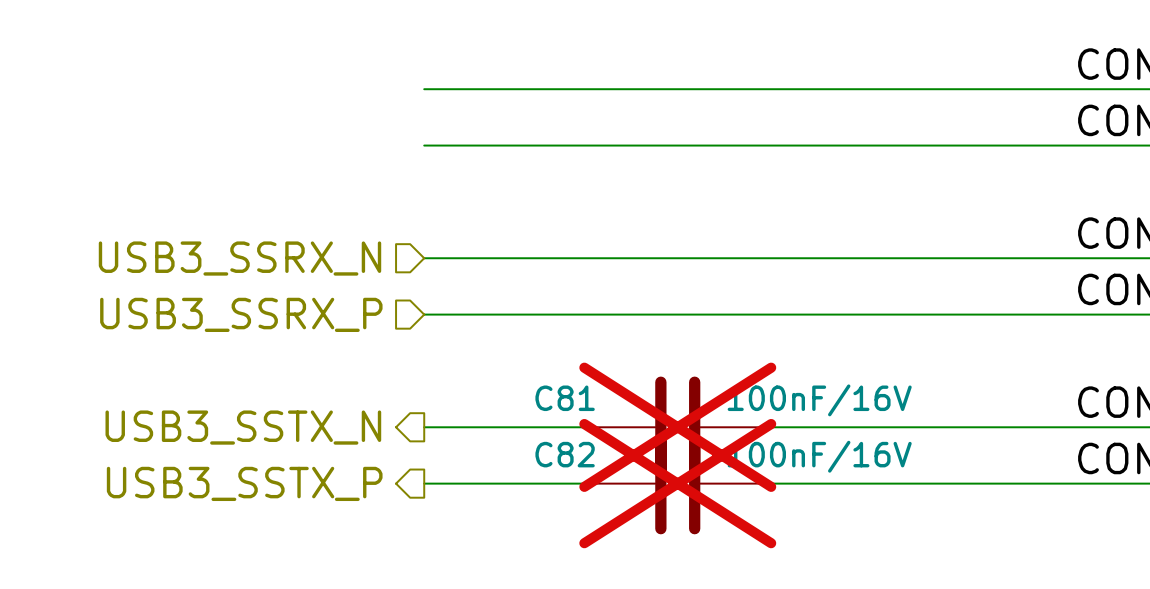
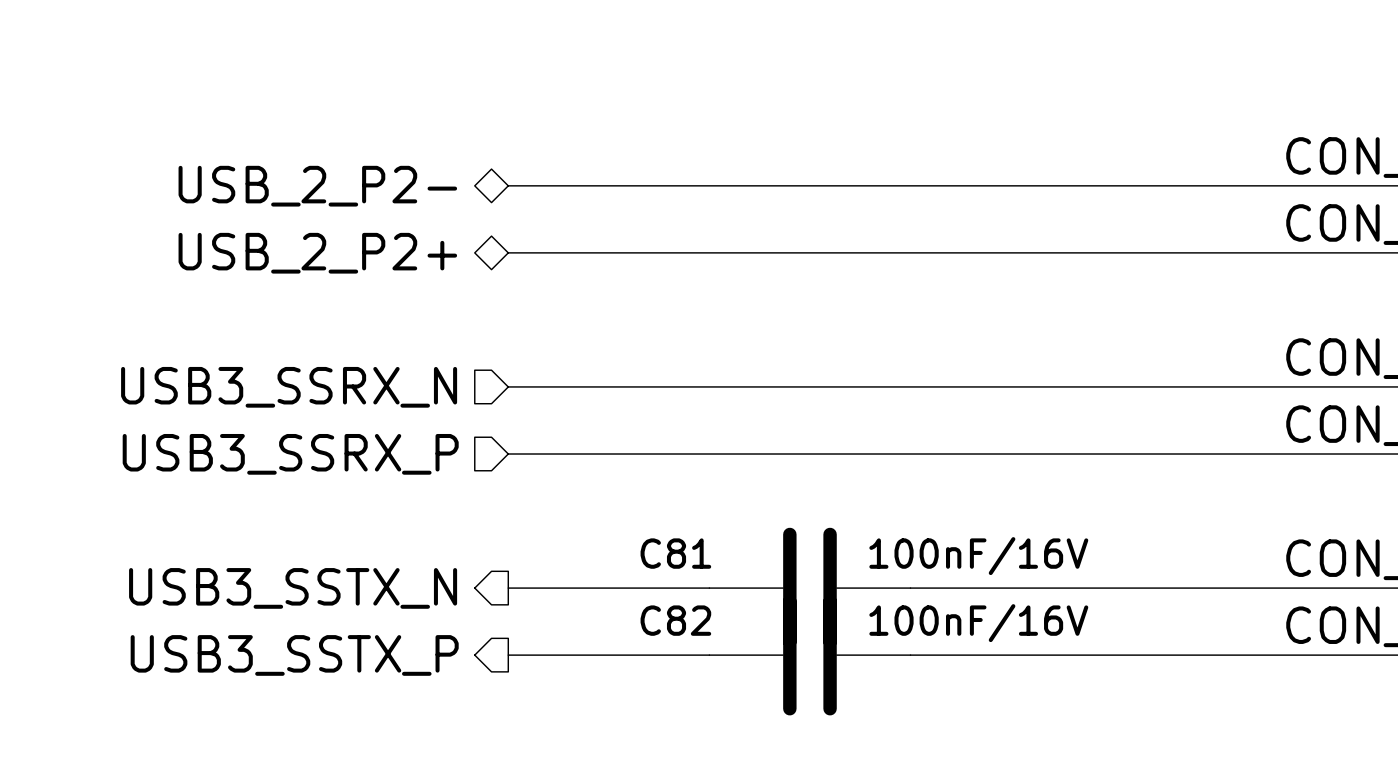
hierarchical label: none -> USB_2_P2- (317, 186)
hierarchical label: none -> USB_2_P2+ (317, 253)
C81 do-not-place cross: (677, 427) -> none
C82 do-not-place cross: (677, 483) -> none

